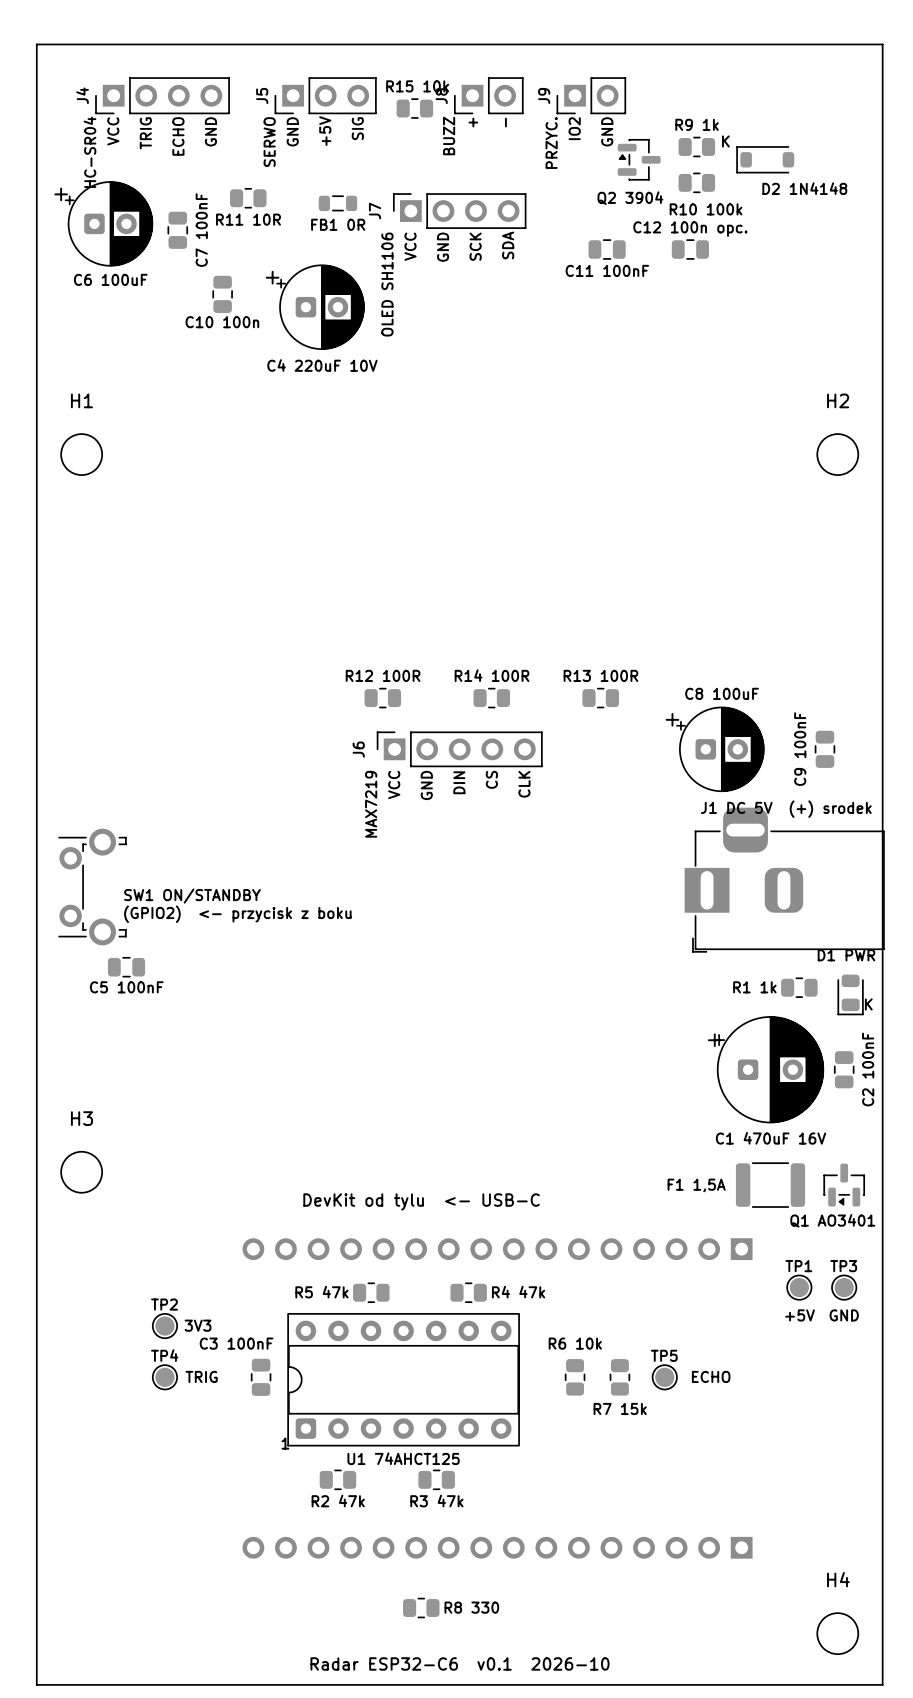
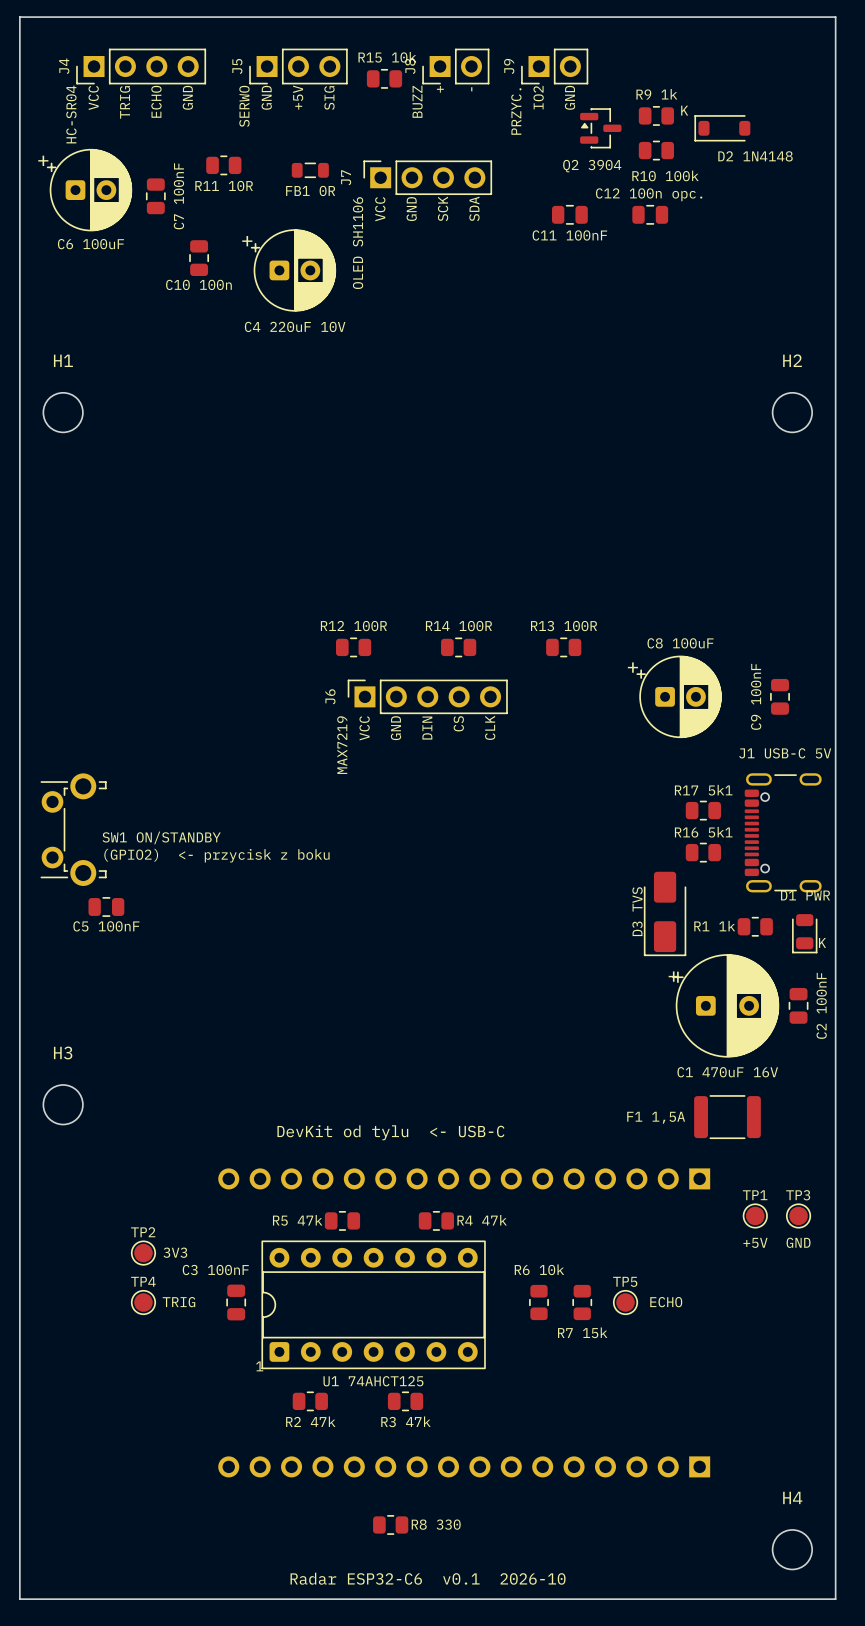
text: none -> J1 USB-C 5V (785, 753)
text: J1 DC 5V (+) srodek (786, 809) -> none
text: none -> R17 5k1 (703, 790)
part: none -> (703, 810)
part: (784, 880) -> none
text: none -> R16 5k1 (703, 832)
part: none -> (783, 832)
part: none -> (703, 852)
text: none -> D3 TVS (637, 911)
part: none -> (665, 913)
part: (844, 1185) -> none
text: Q1 AO3401 (832, 1220) -> none

